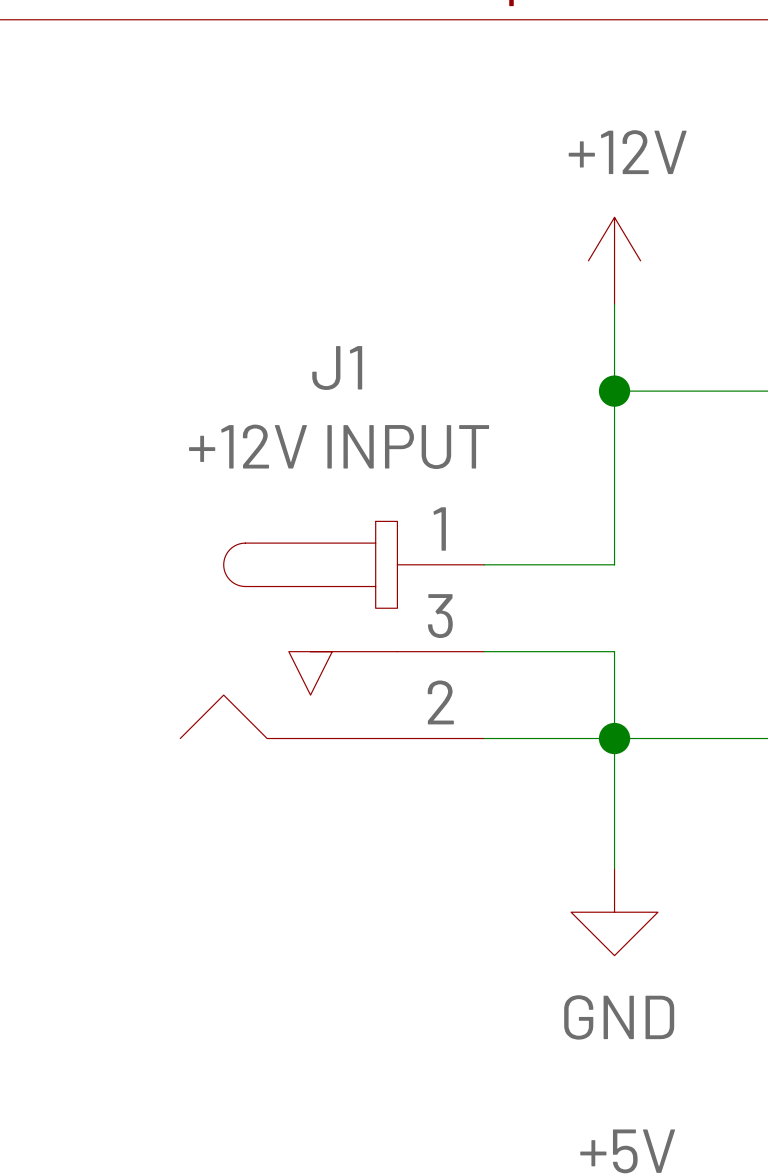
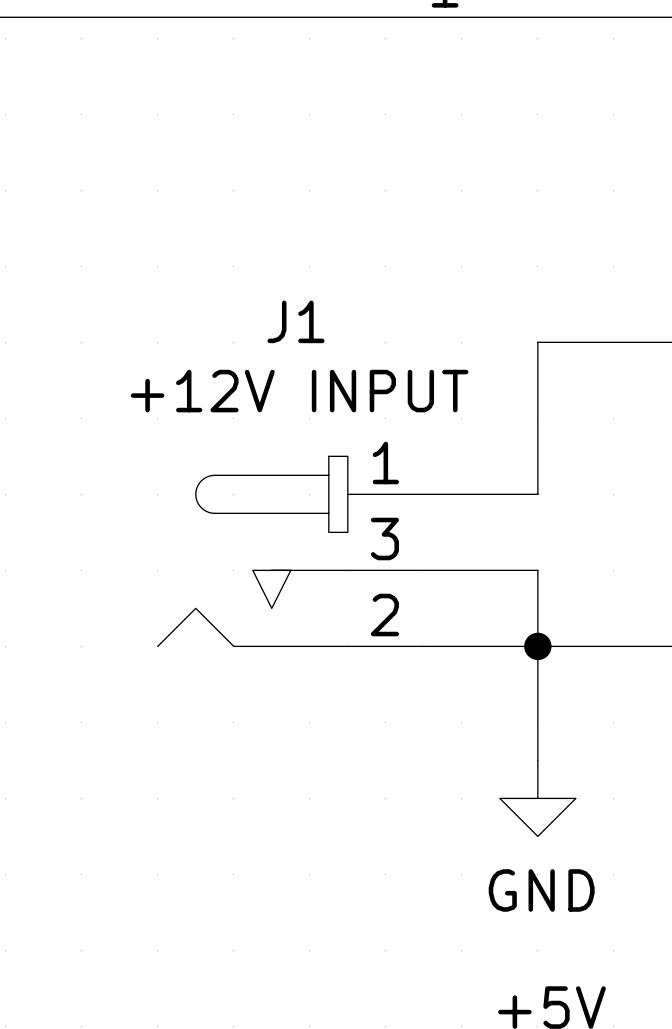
power symbol: +12V (614, 260) -> none
wire: (614, 304) (614, 391) -> none
junction: (614, 391) -> none

